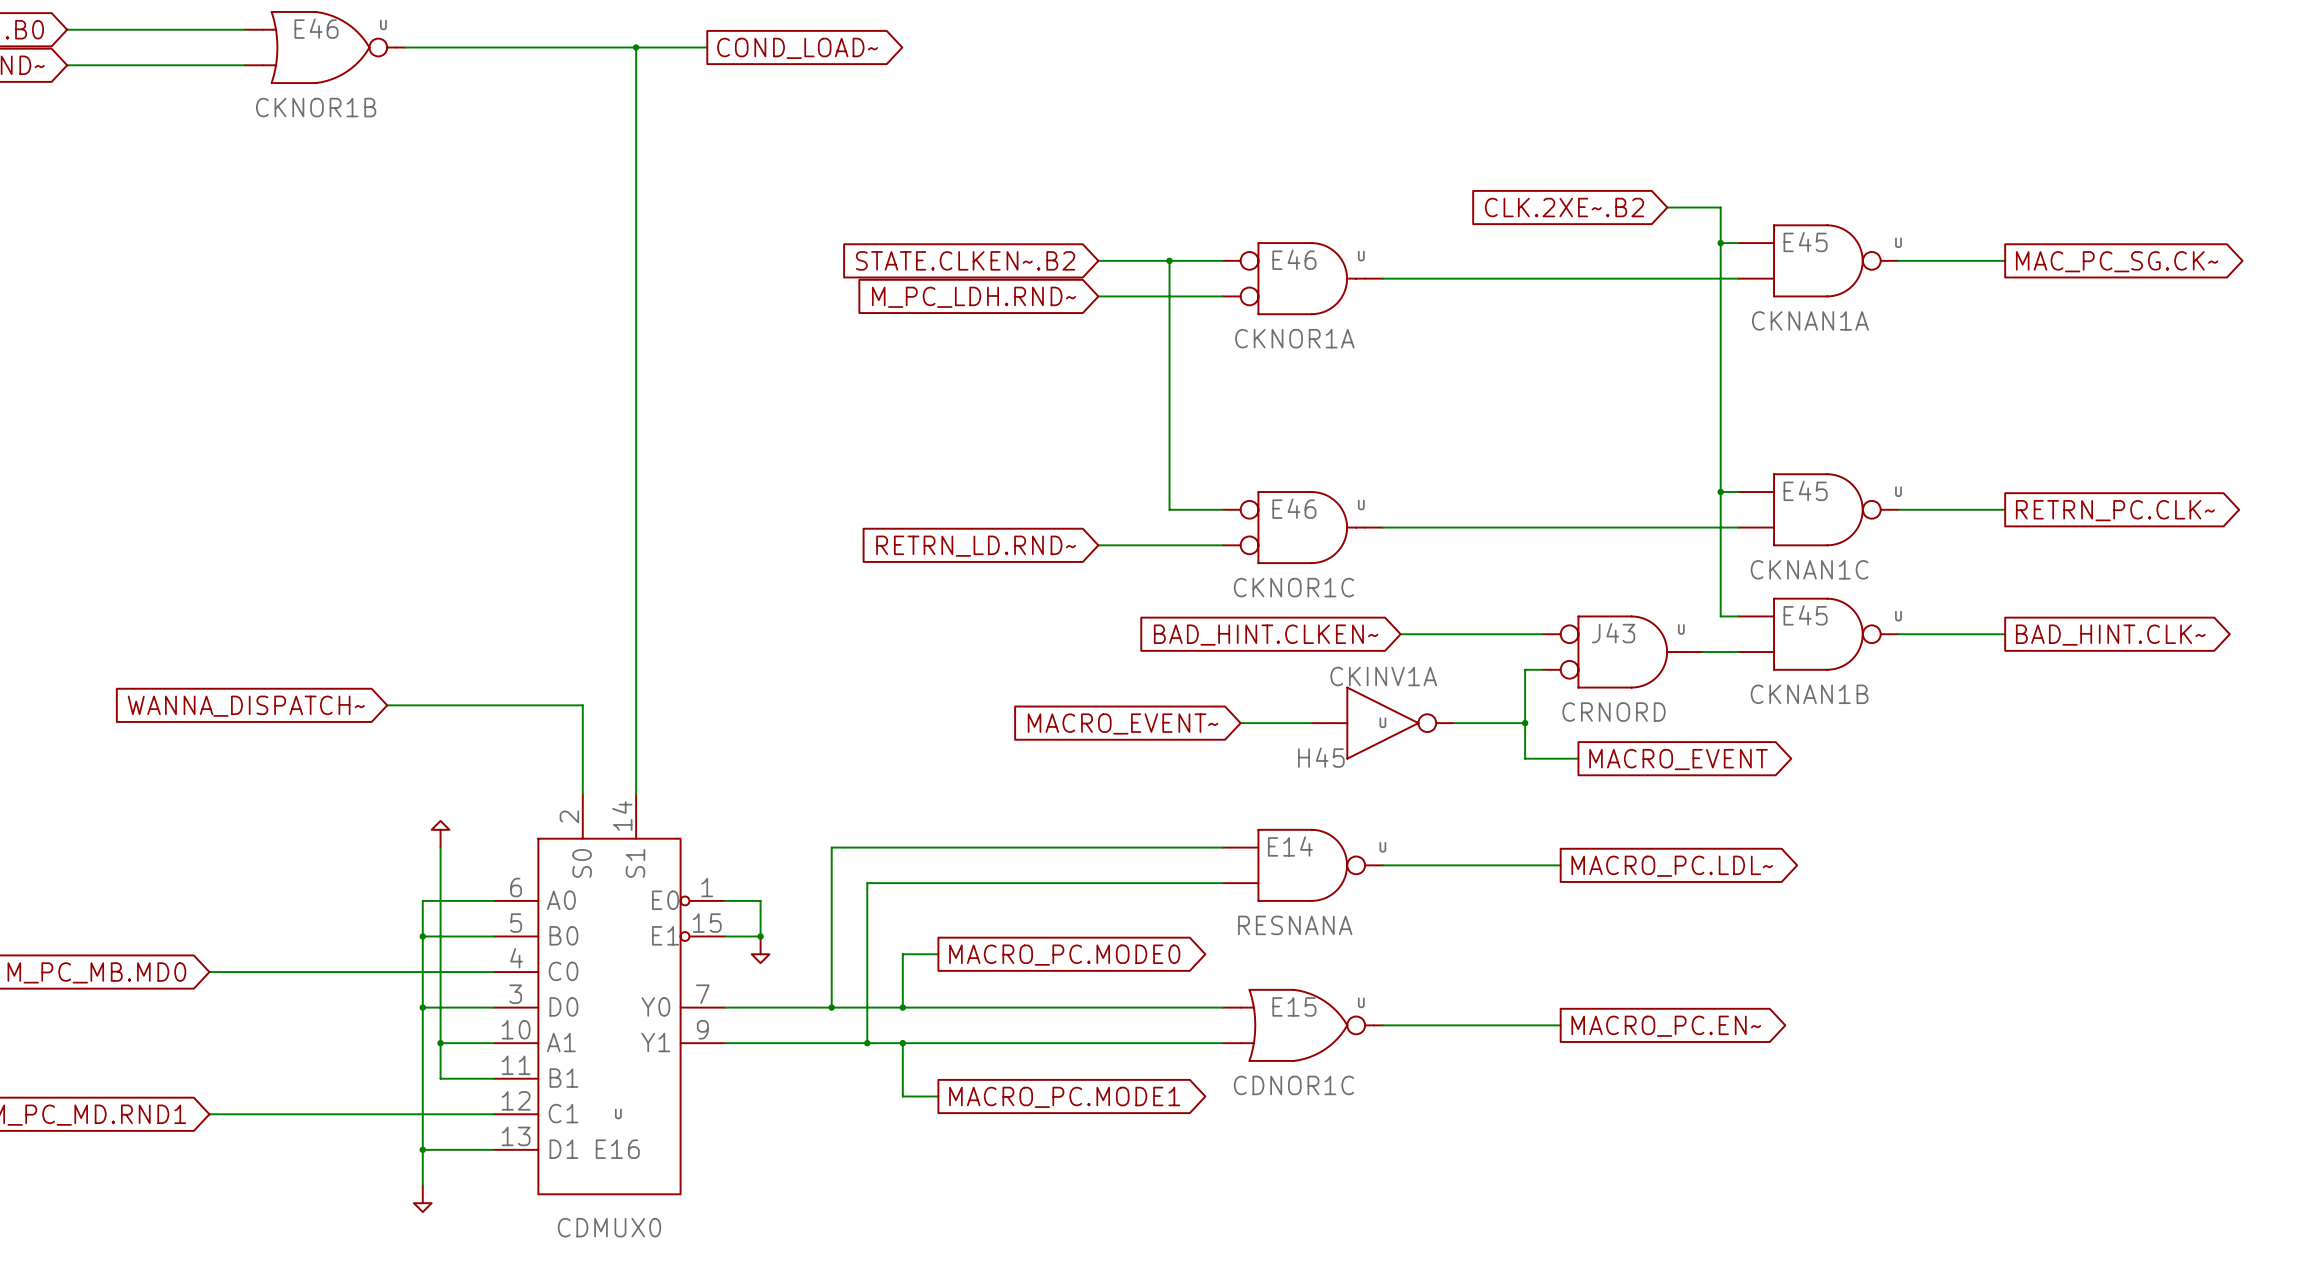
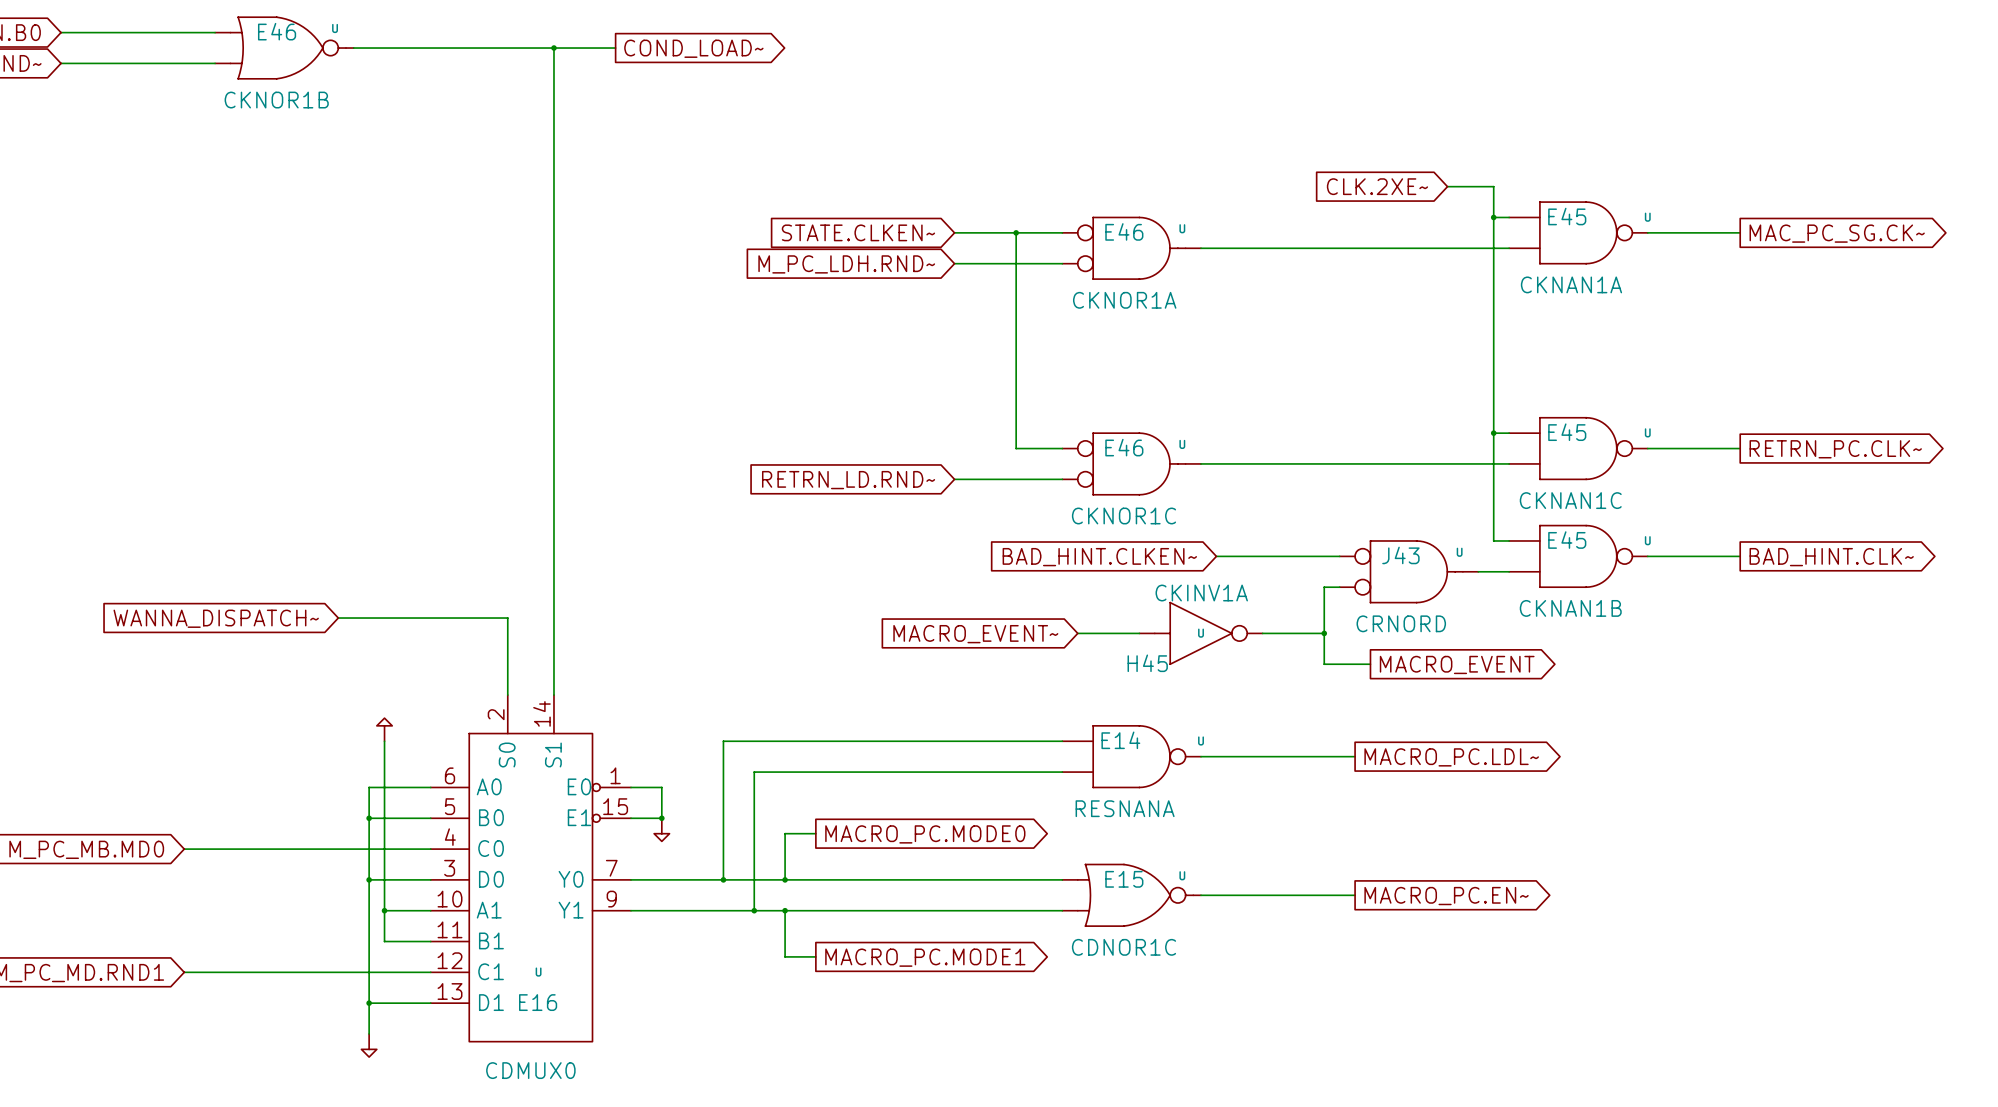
global label: CLK.2XE~.B2 (1564, 207) -> CLK.2XE~ (1377, 186)
global label: STATE.CLKEN~.B2 (965, 260) -> STATE.CLKEN~ (858, 232)

